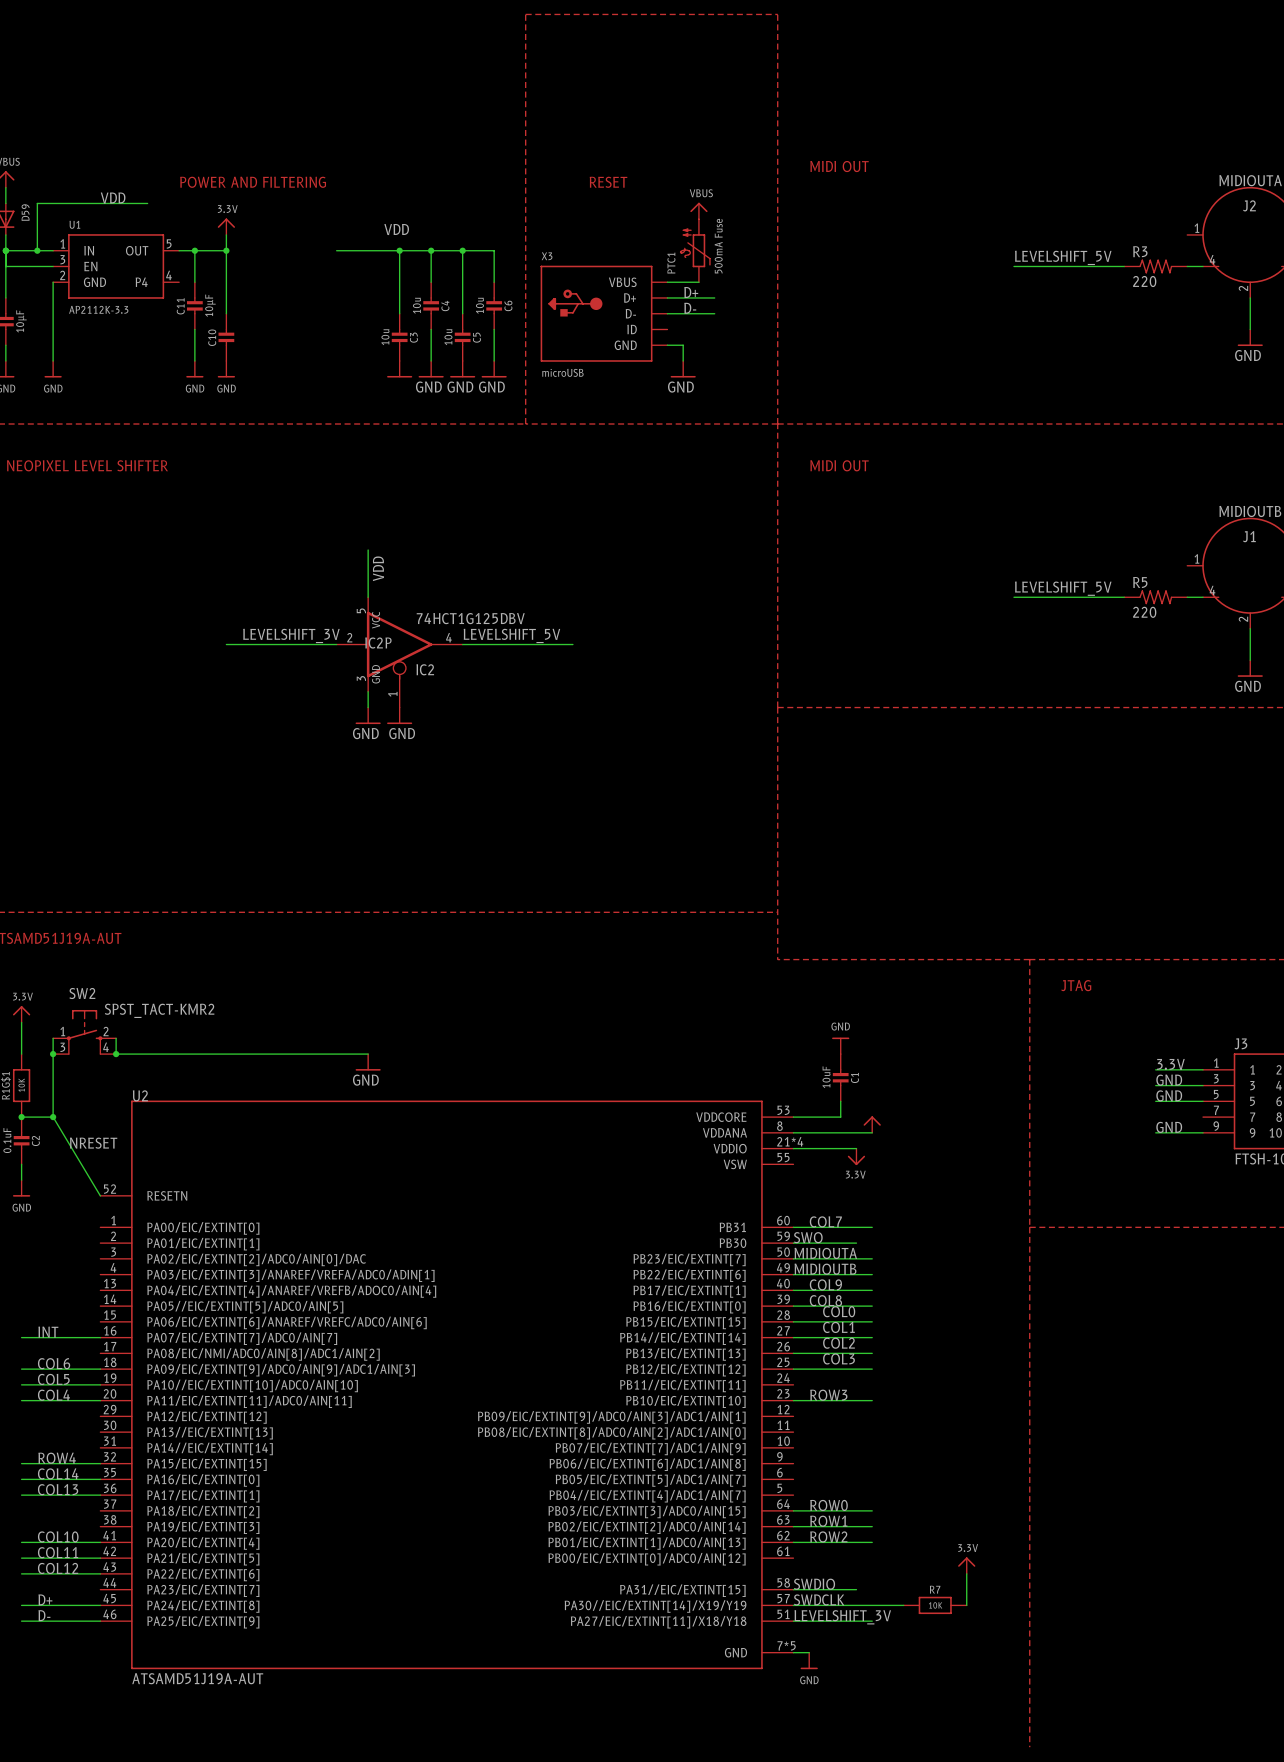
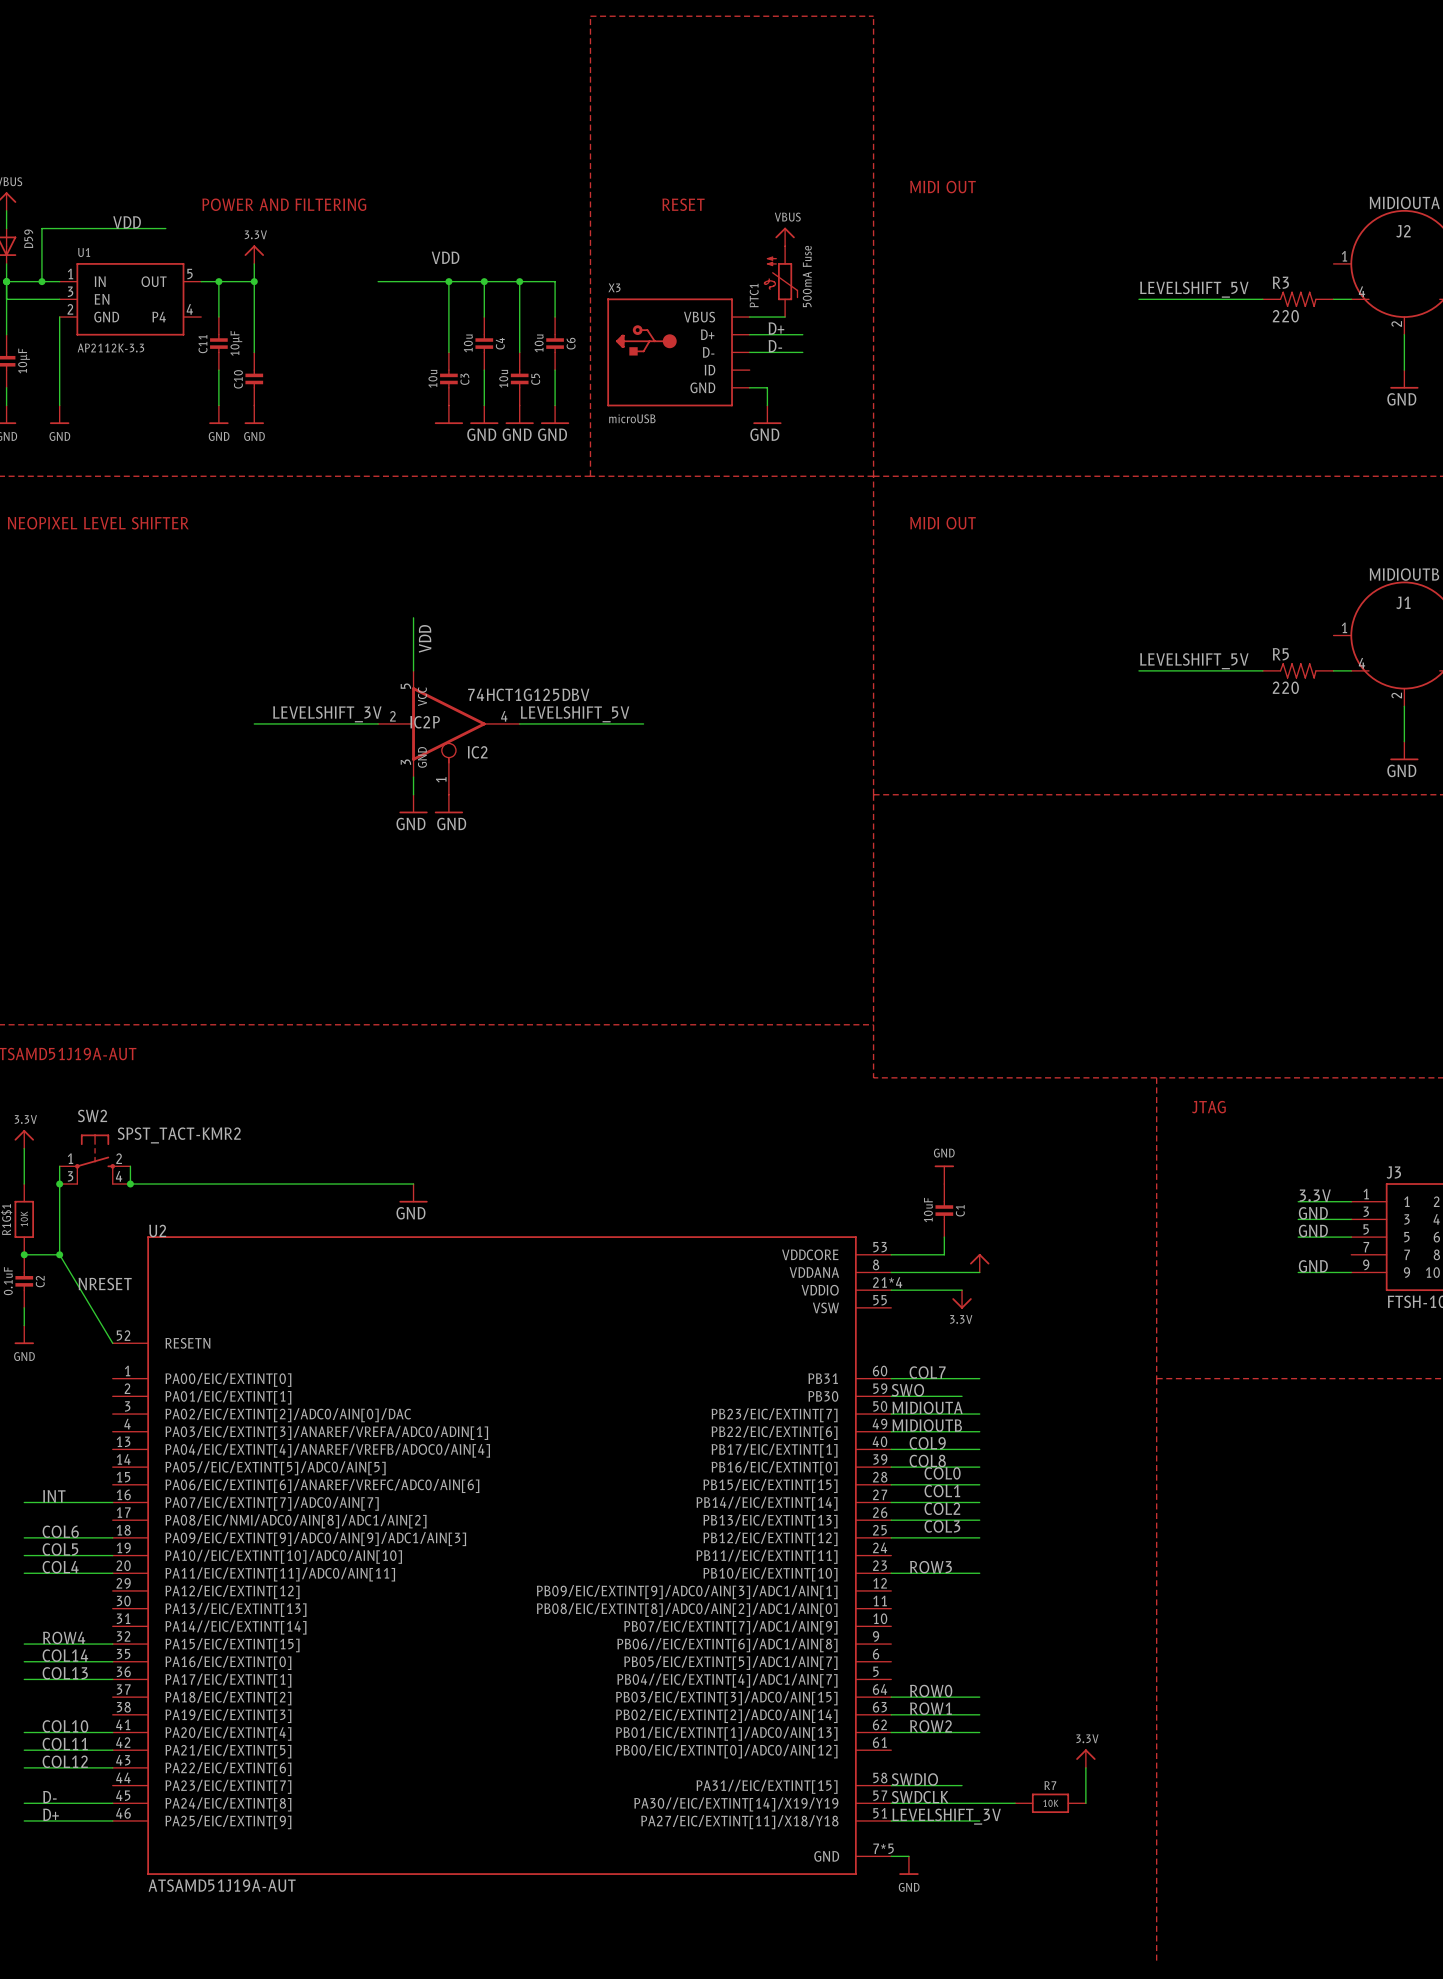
label: D+ (45, 1599) -> D- (49, 1797)
label: D- (44, 1615) -> D+ (51, 1814)

